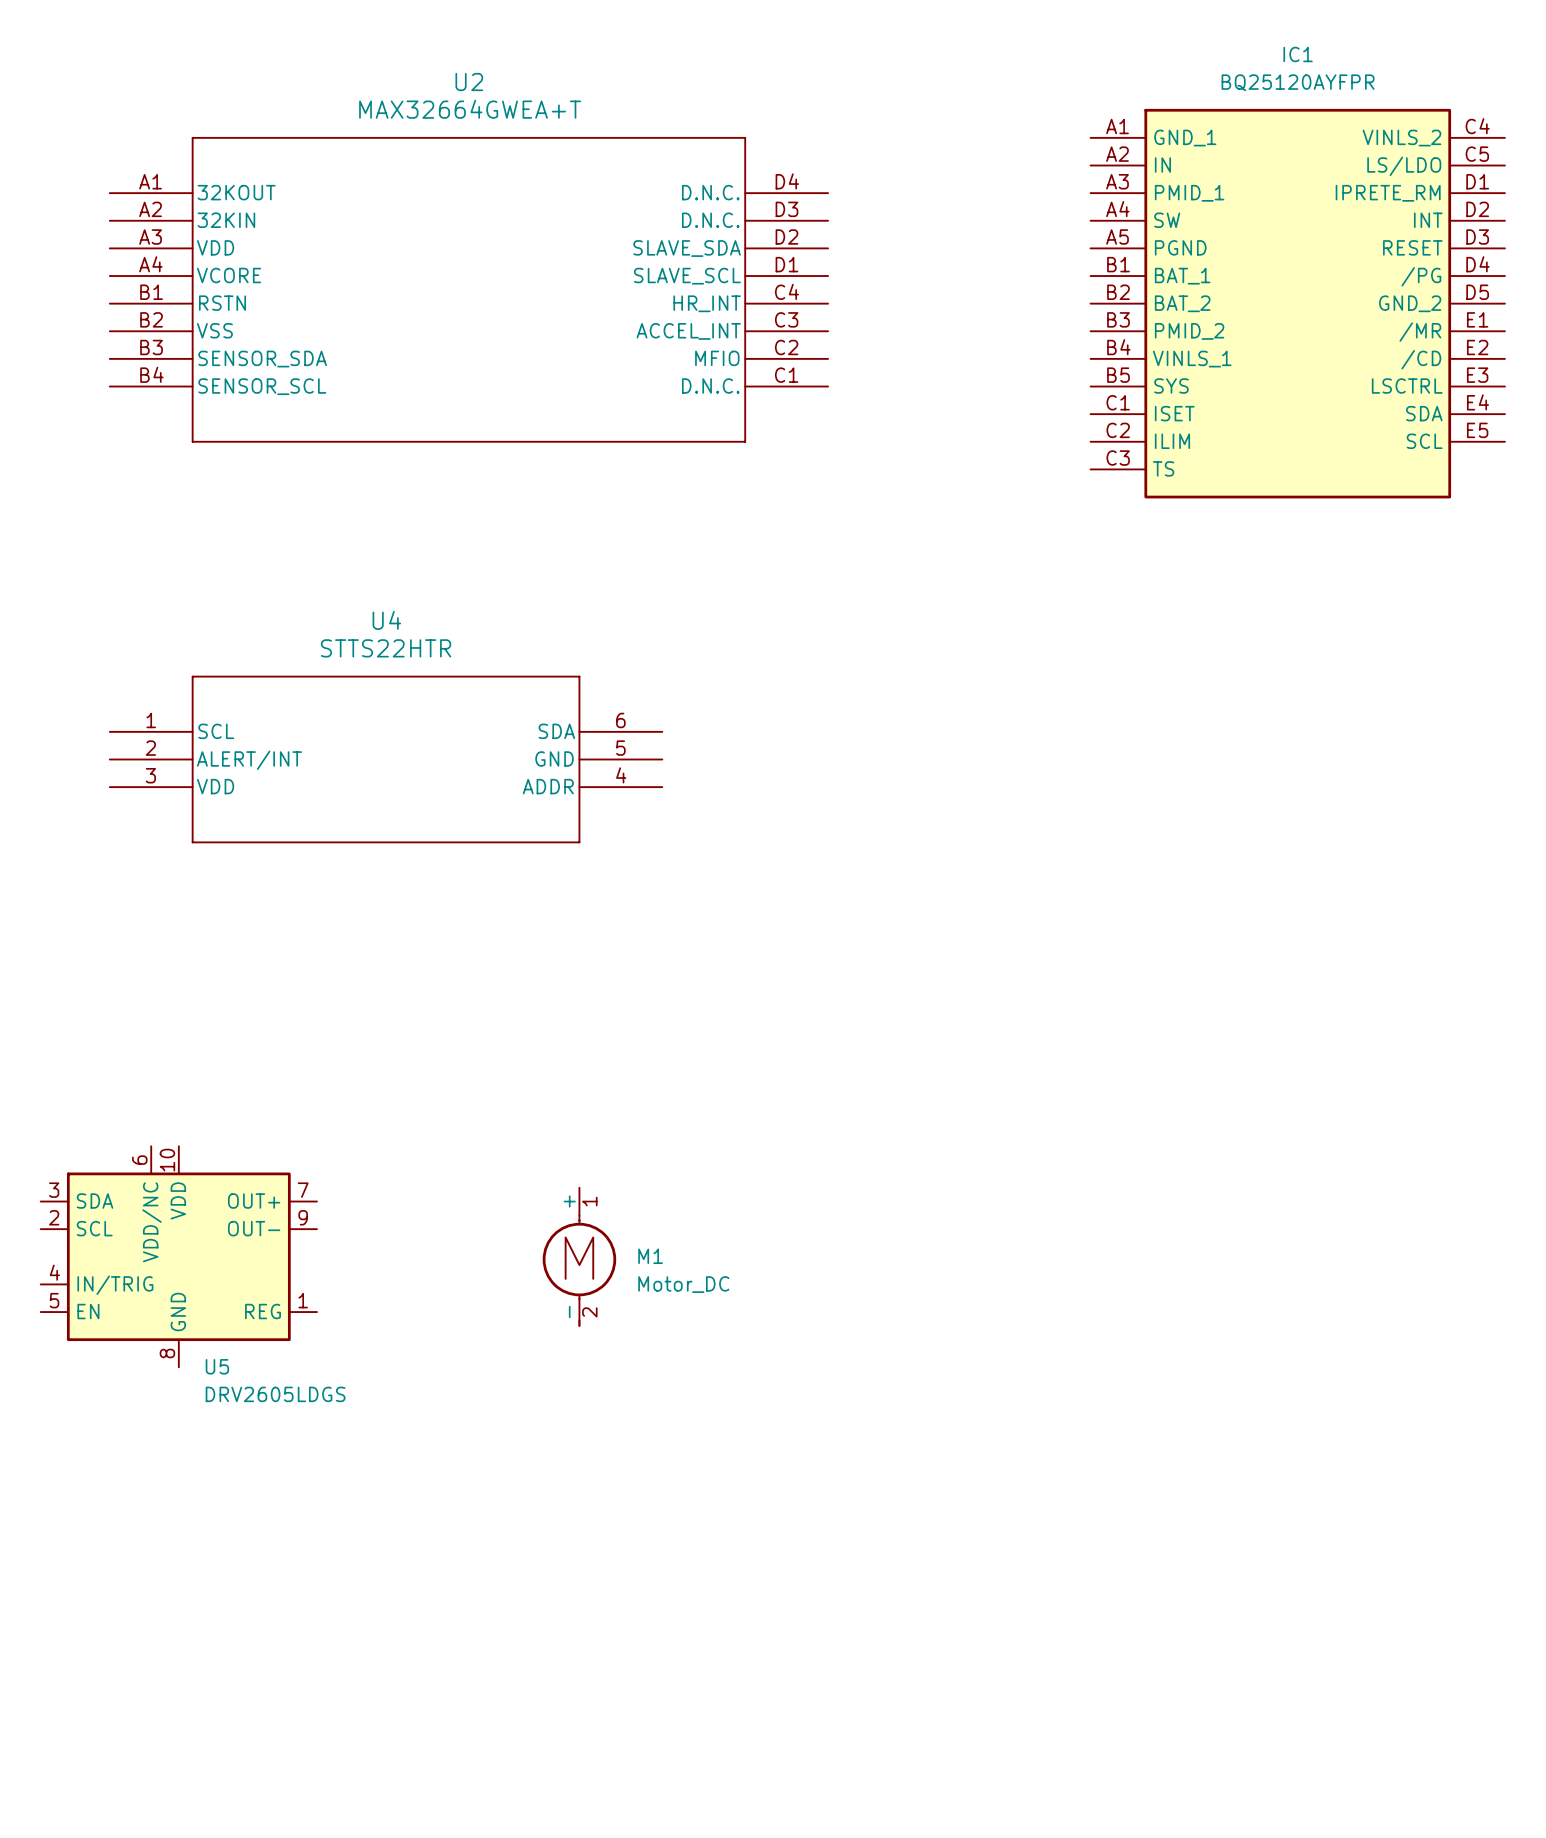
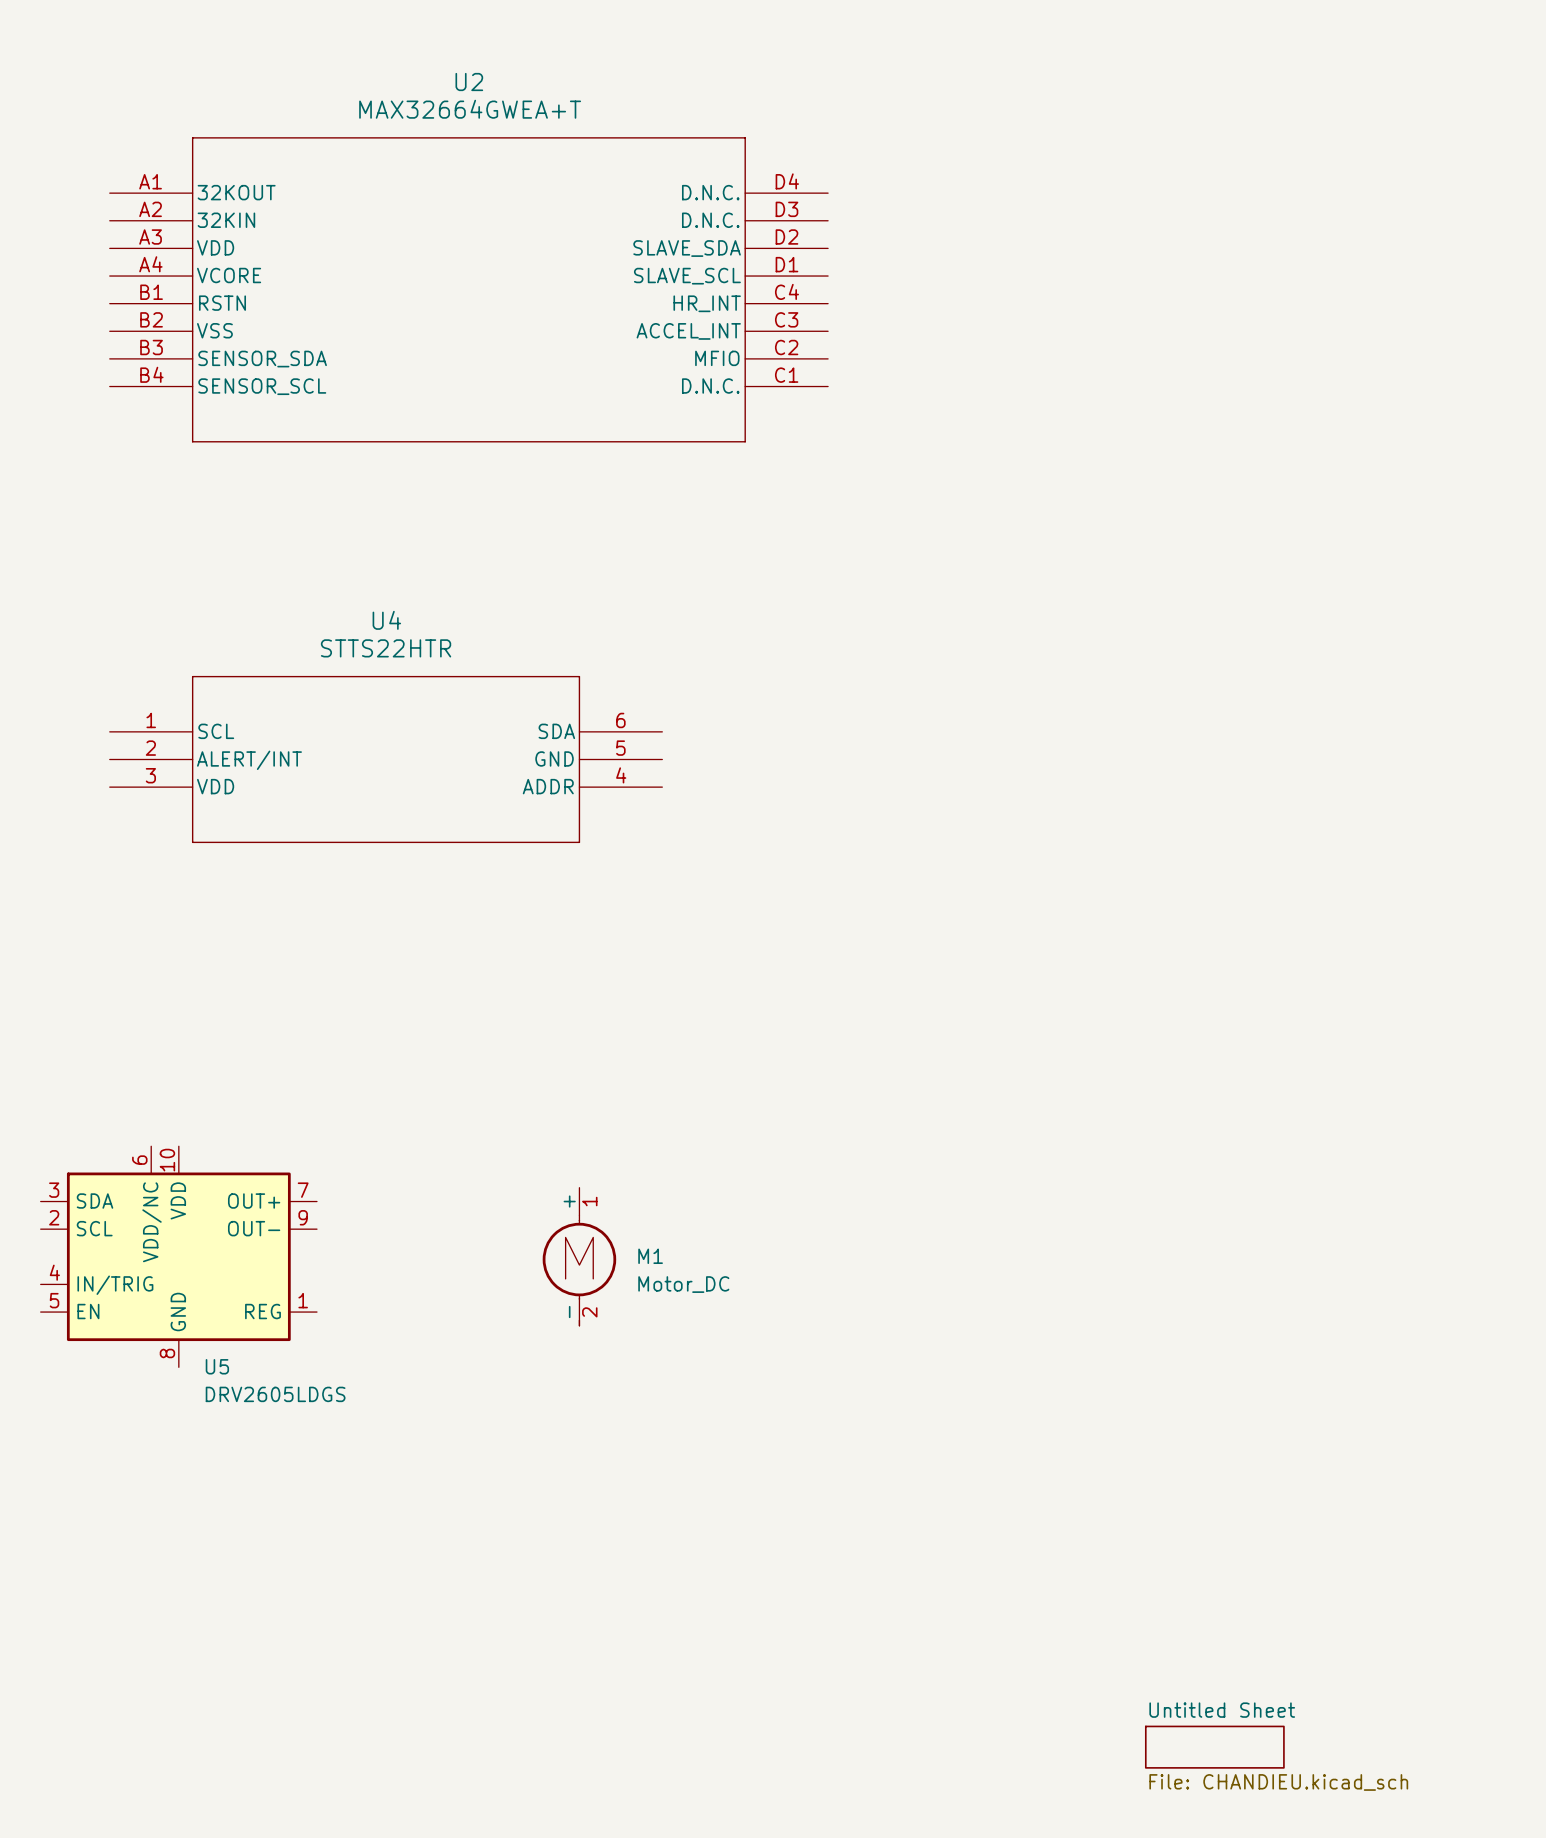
IC1: BQ25120AYFPR (1297, 303) -> none
sheet Untitled Sheet: none -> File: CHANDIEU.kicad_sch (1214, 1747)

